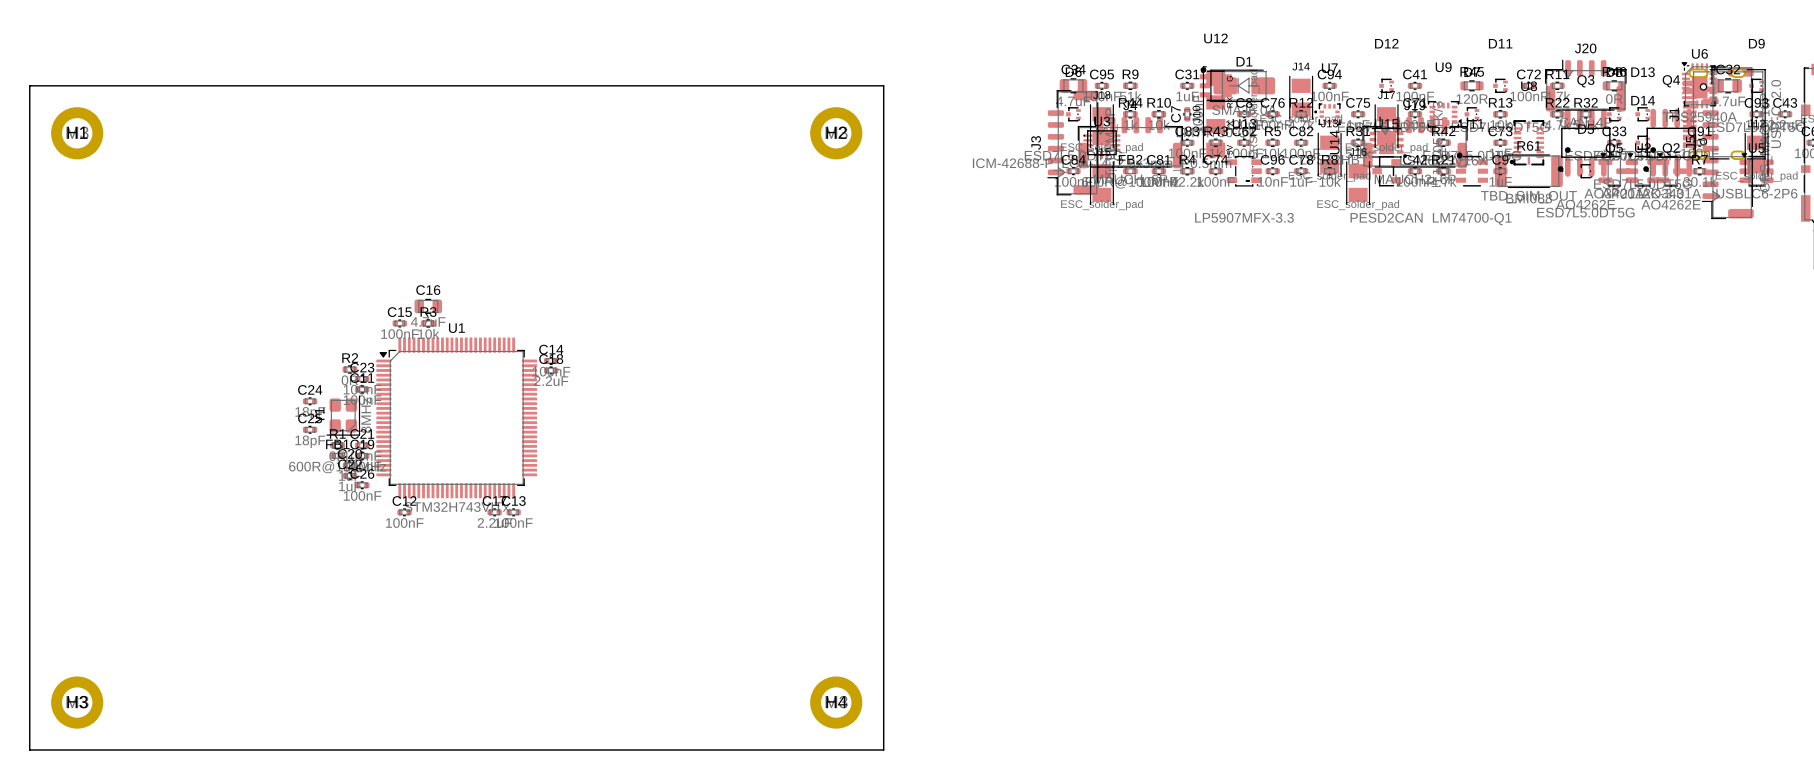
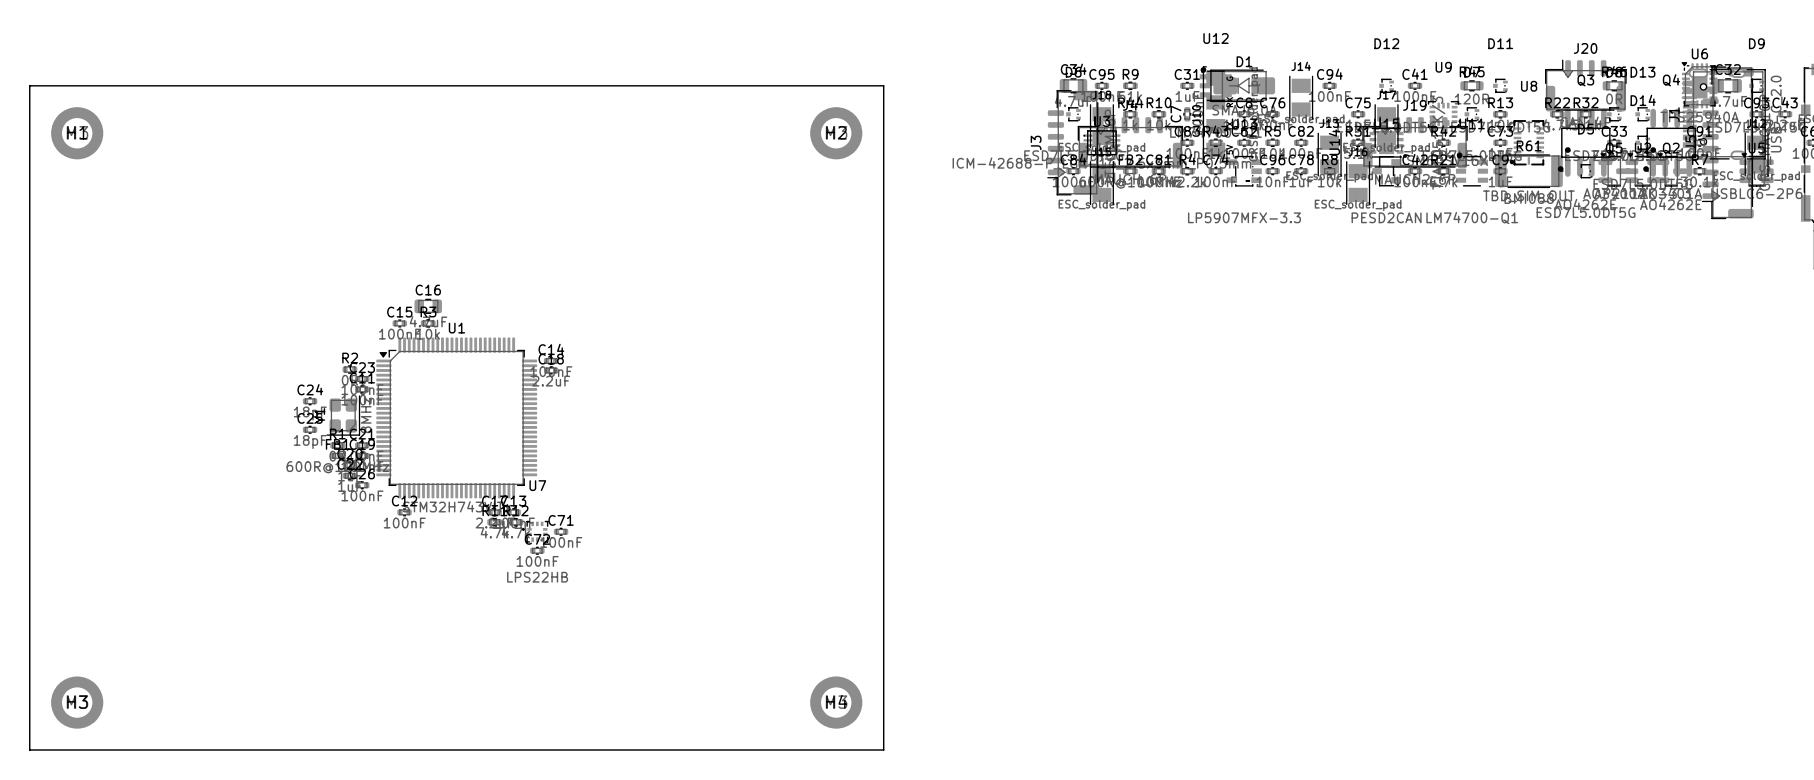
C72 position: (1528, 85) -> (537, 550)
R11 position: (1557, 85) -> (494, 522)
R12 position: (1301, 114) -> (515, 522)
U7 position: (1327, 114) -> (535, 531)
C71 position: (1415, 114) -> (561, 531)

